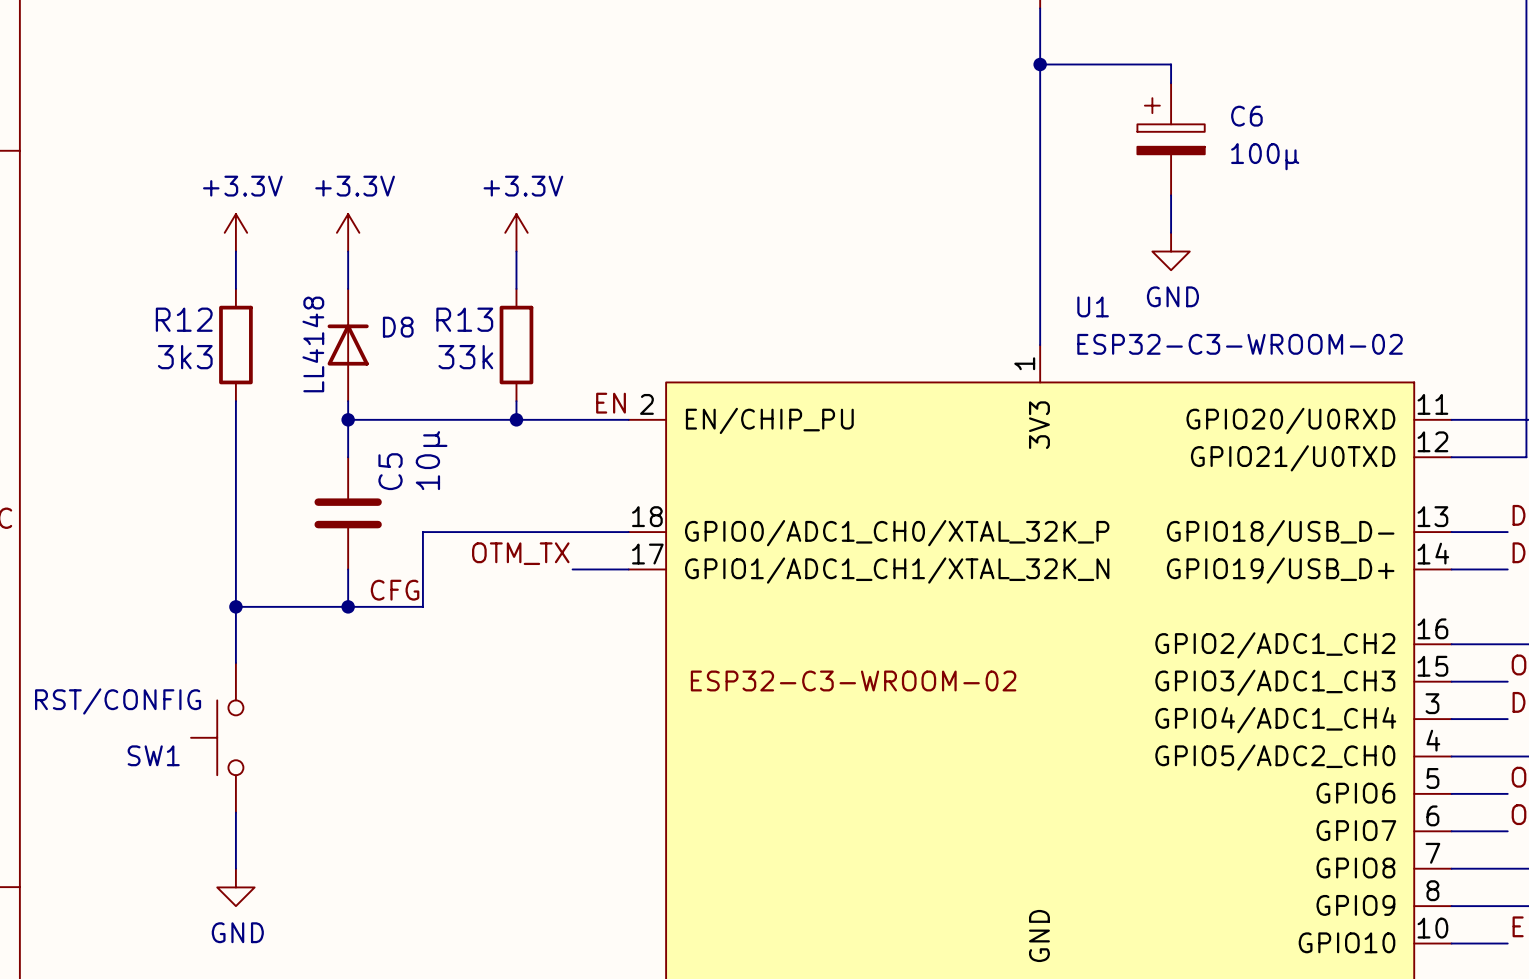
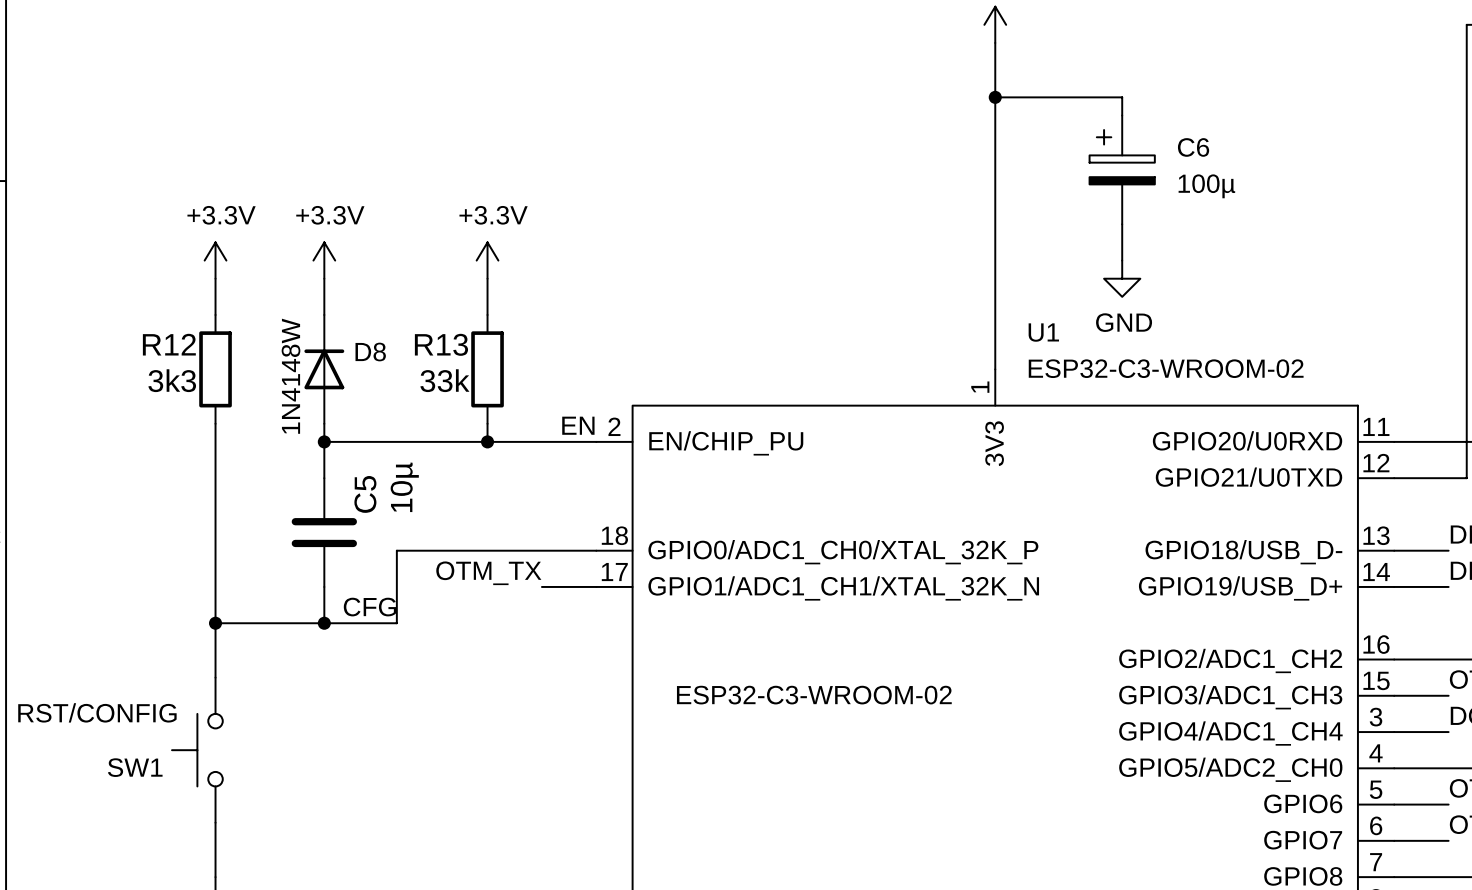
D8 value: LL4148 (313, 344) -> 1N4148W (291, 376)

